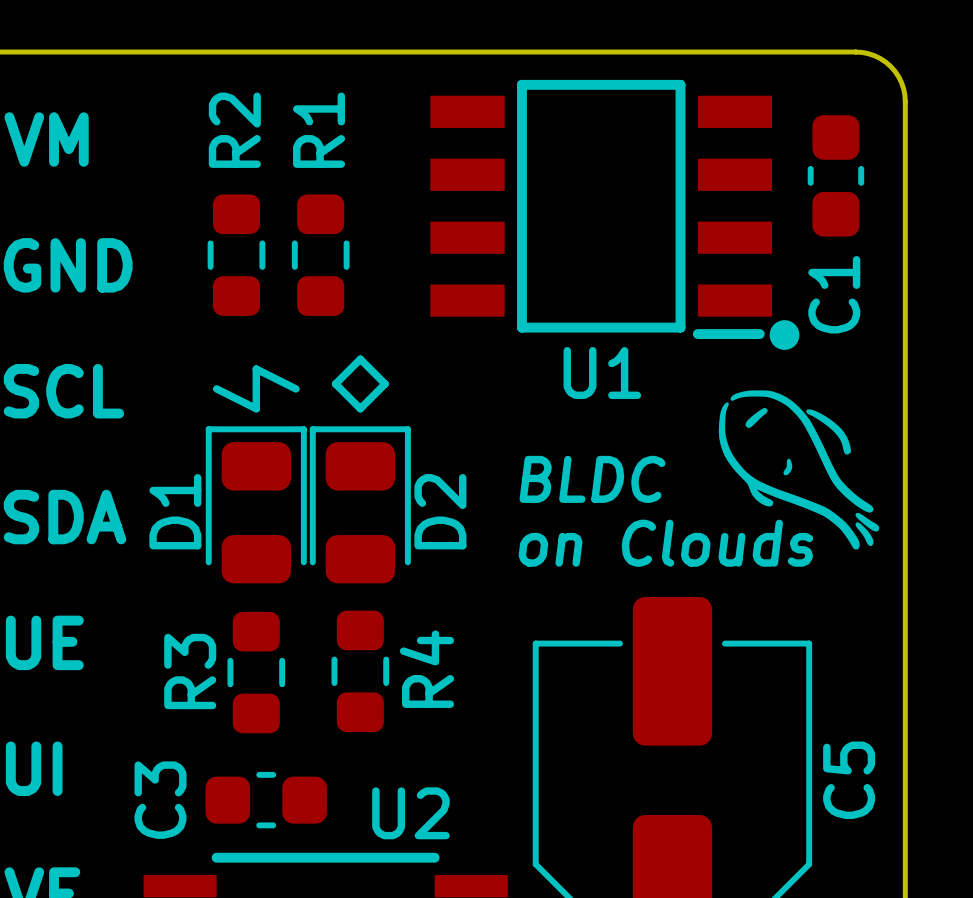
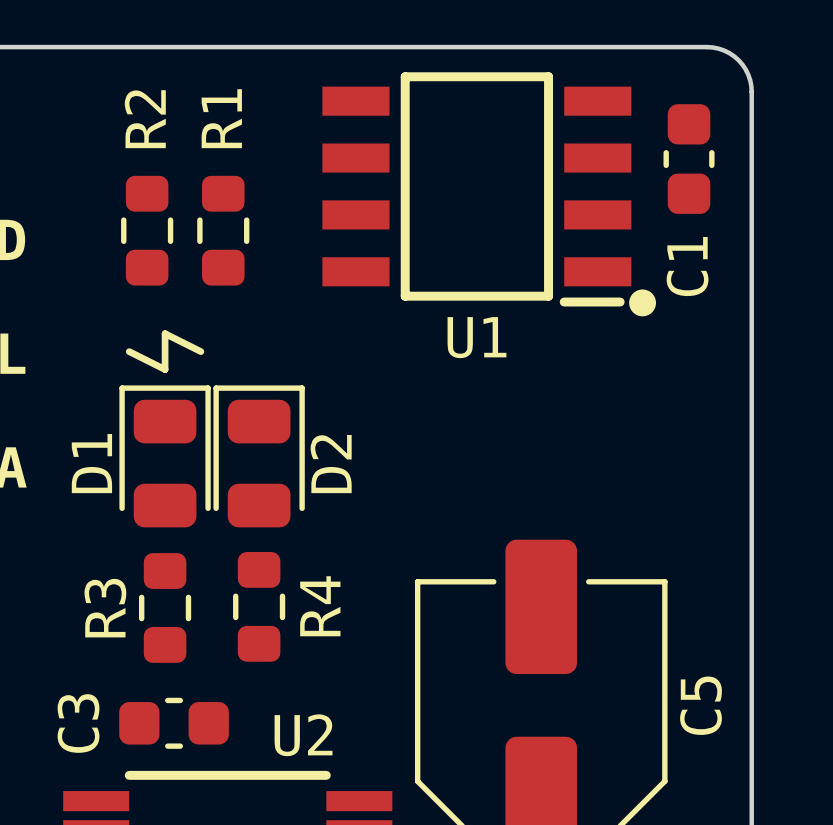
line: (360, 359) (385, 383) (360, 408) (335, 383) (360, 359) -> none
drawing: [718, 390, 880, 550] -> none
text: BLDC (592, 479) -> none
text: on Clouds (665, 543) -> none

